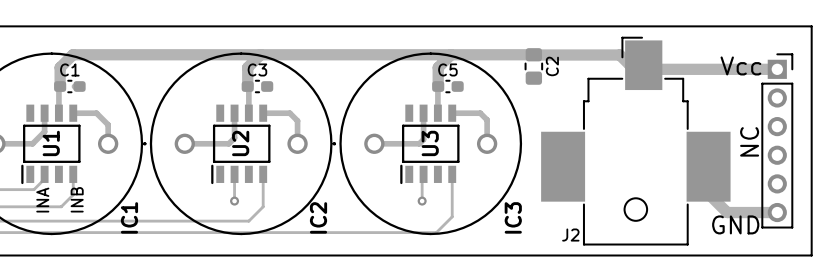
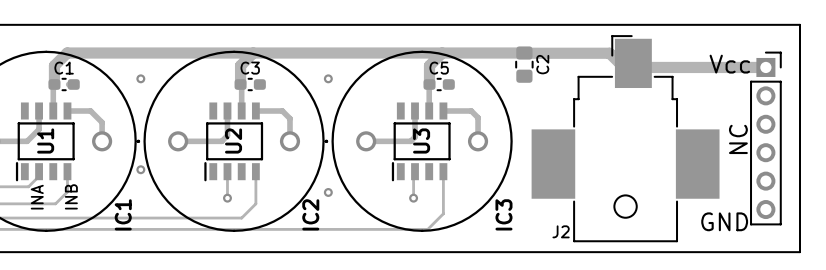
via: none -> (140, 78)
via: none -> (328, 78)
via: none -> (140, 169)
track: (708, 193) (727, 212) (777, 212) -> none
via: none -> (328, 192)

